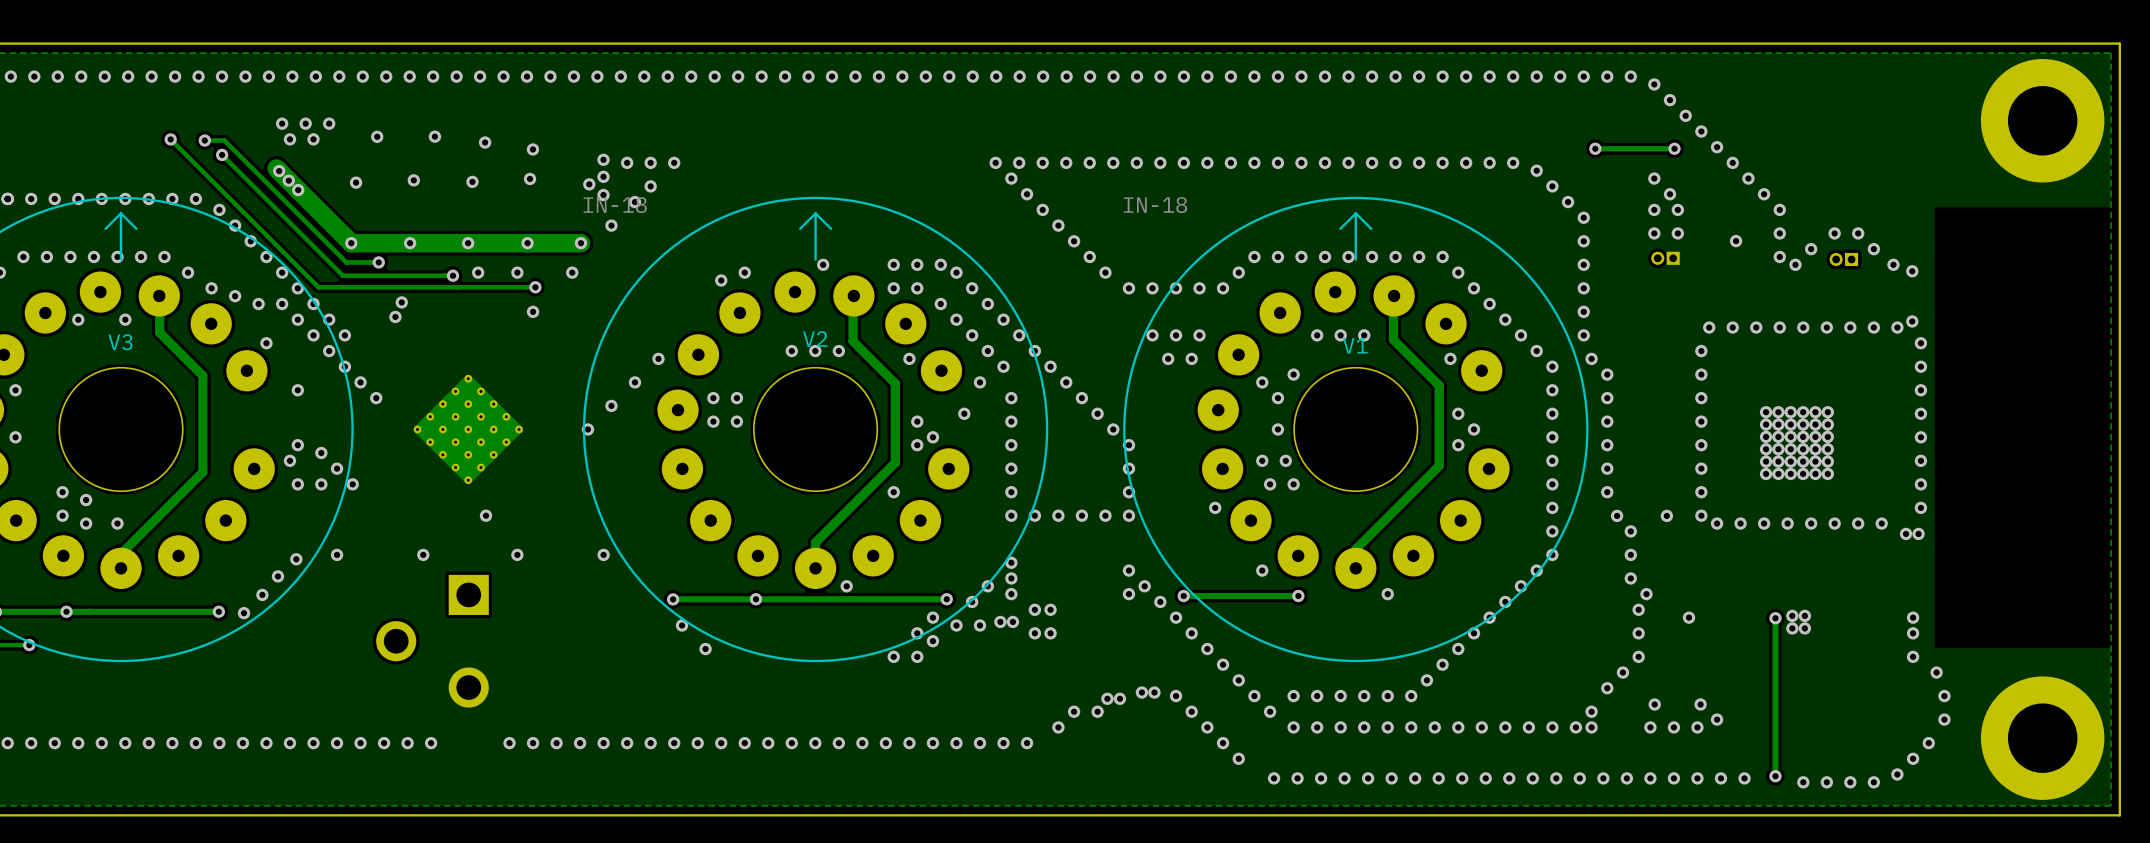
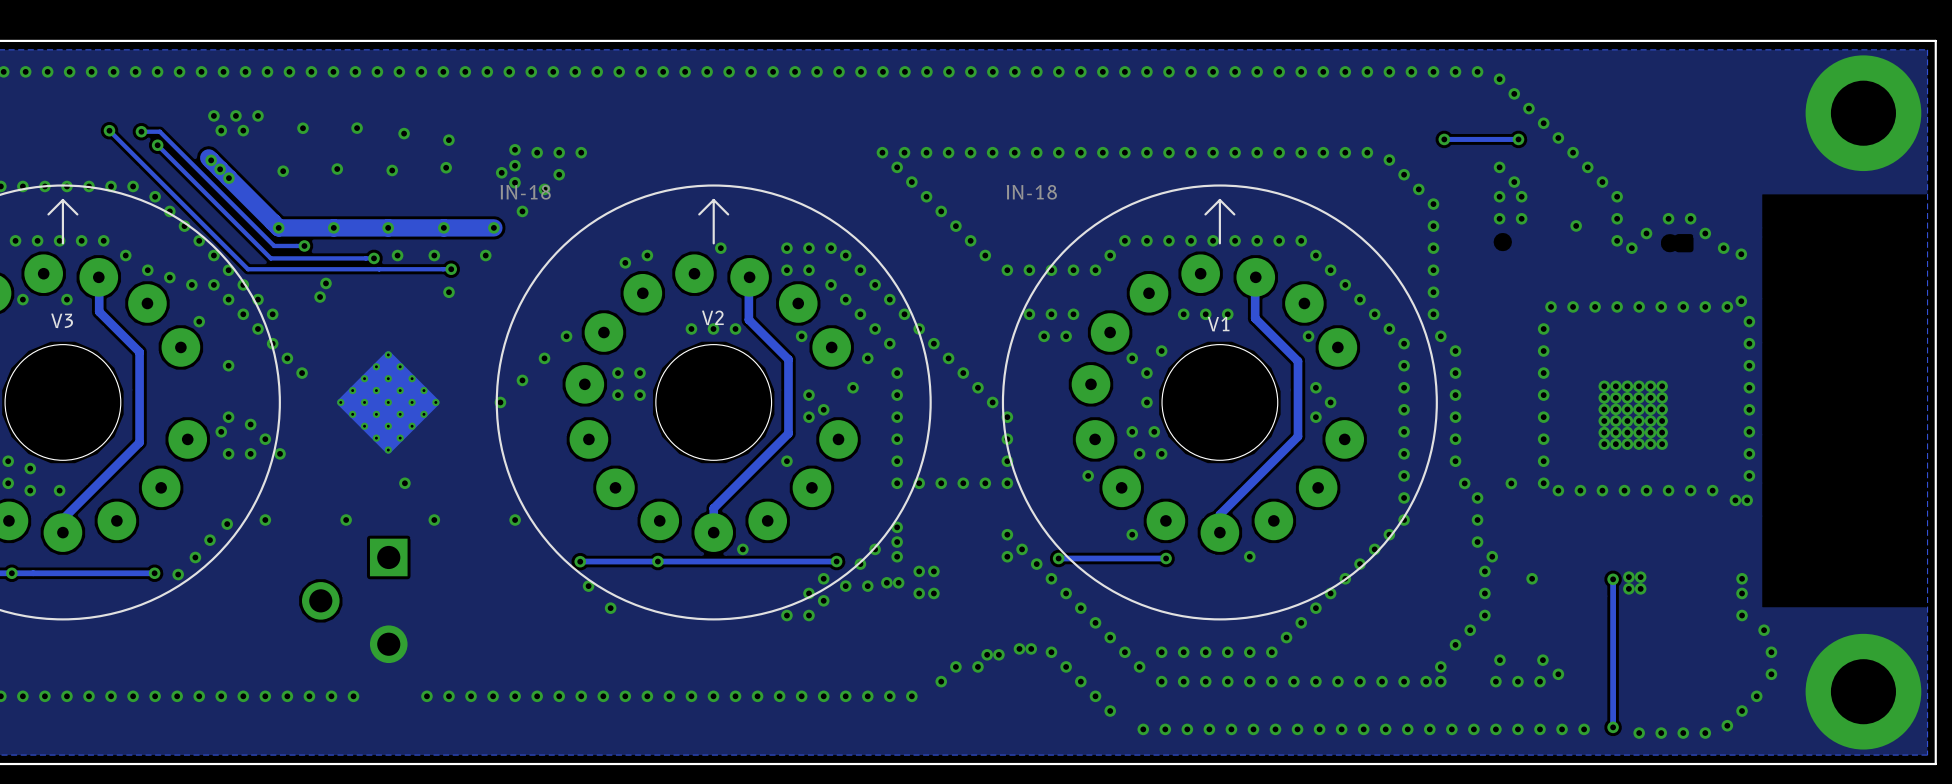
part: (1665, 258) -> none
part: (1843, 259) -> none

